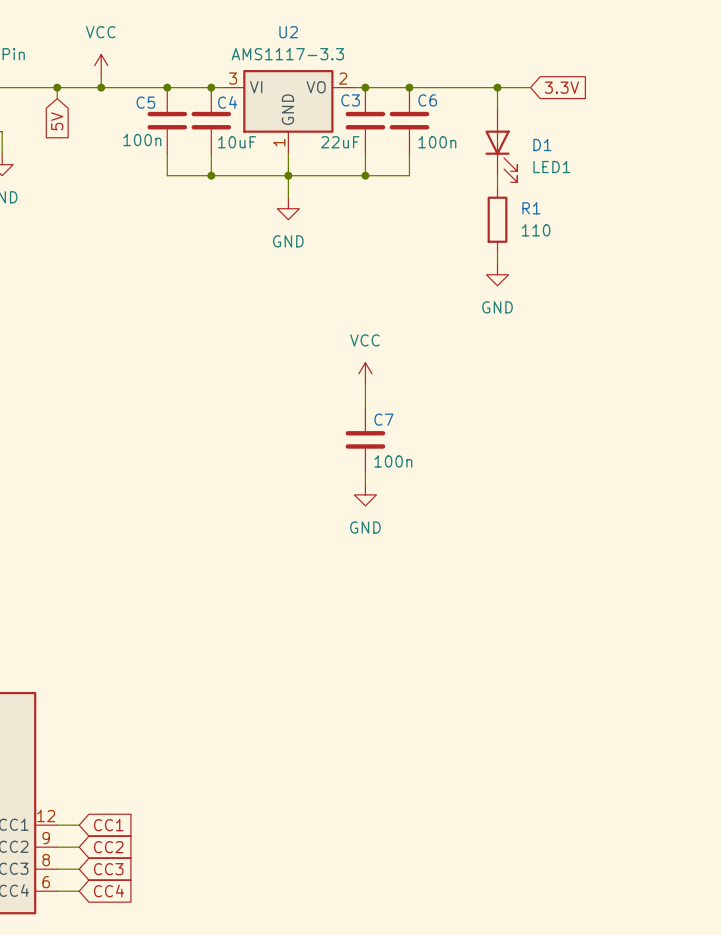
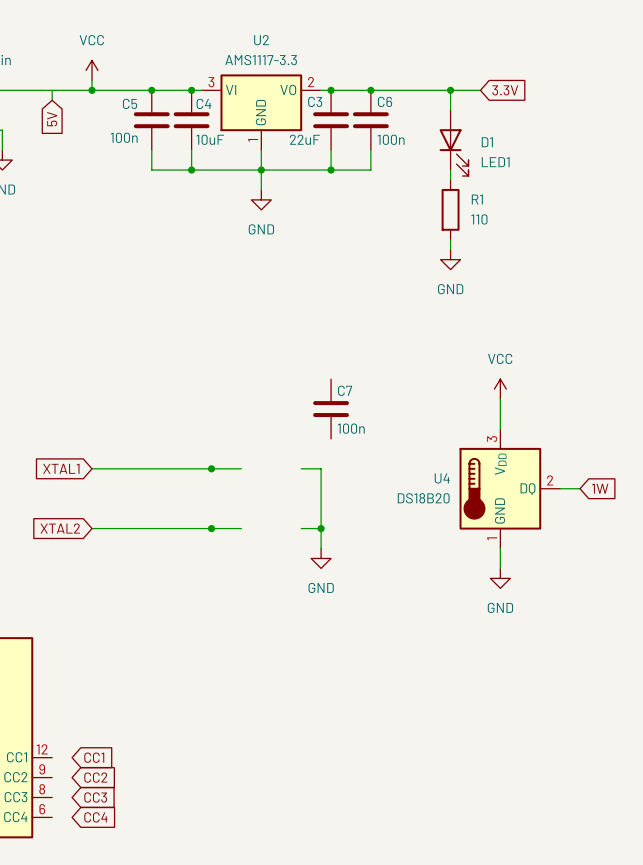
junction: (57, 87) -> none
power symbol position: VCC (365, 373) -> VCC (500, 389)
wire: (365, 384) (365, 406) -> none
wire: none -> (500, 399) (500, 428)
wire: (365, 472) (365, 483) -> none
power symbol position: GND (365, 494) -> GND (321, 558)
global label: none -> XTAL1 (61, 468)
wire: none -> (92, 468) (241, 468)
junction: none -> (211, 468)
wire: none -> (301, 468) (321, 468) (321, 548)
U4: none -> DS18B20 (509, 488)
wire: none -> (560, 488) (580, 488)
global label: none -> 1W (600, 488)
global label: none -> XTAL2 (60, 528)
wire: none -> (92, 528) (241, 528)
junction: none -> (211, 528)
wire: none -> (301, 528) (321, 528)
junction: none -> (321, 528)
wire: none -> (500, 548) (500, 568)
power symbol: none -> GND (500, 578)
wire: (57, 825) (79, 825) -> none
wire: (57, 847) (79, 847) -> none
wire: (57, 869) (79, 869) -> none
wire: (57, 891) (79, 891) -> none

